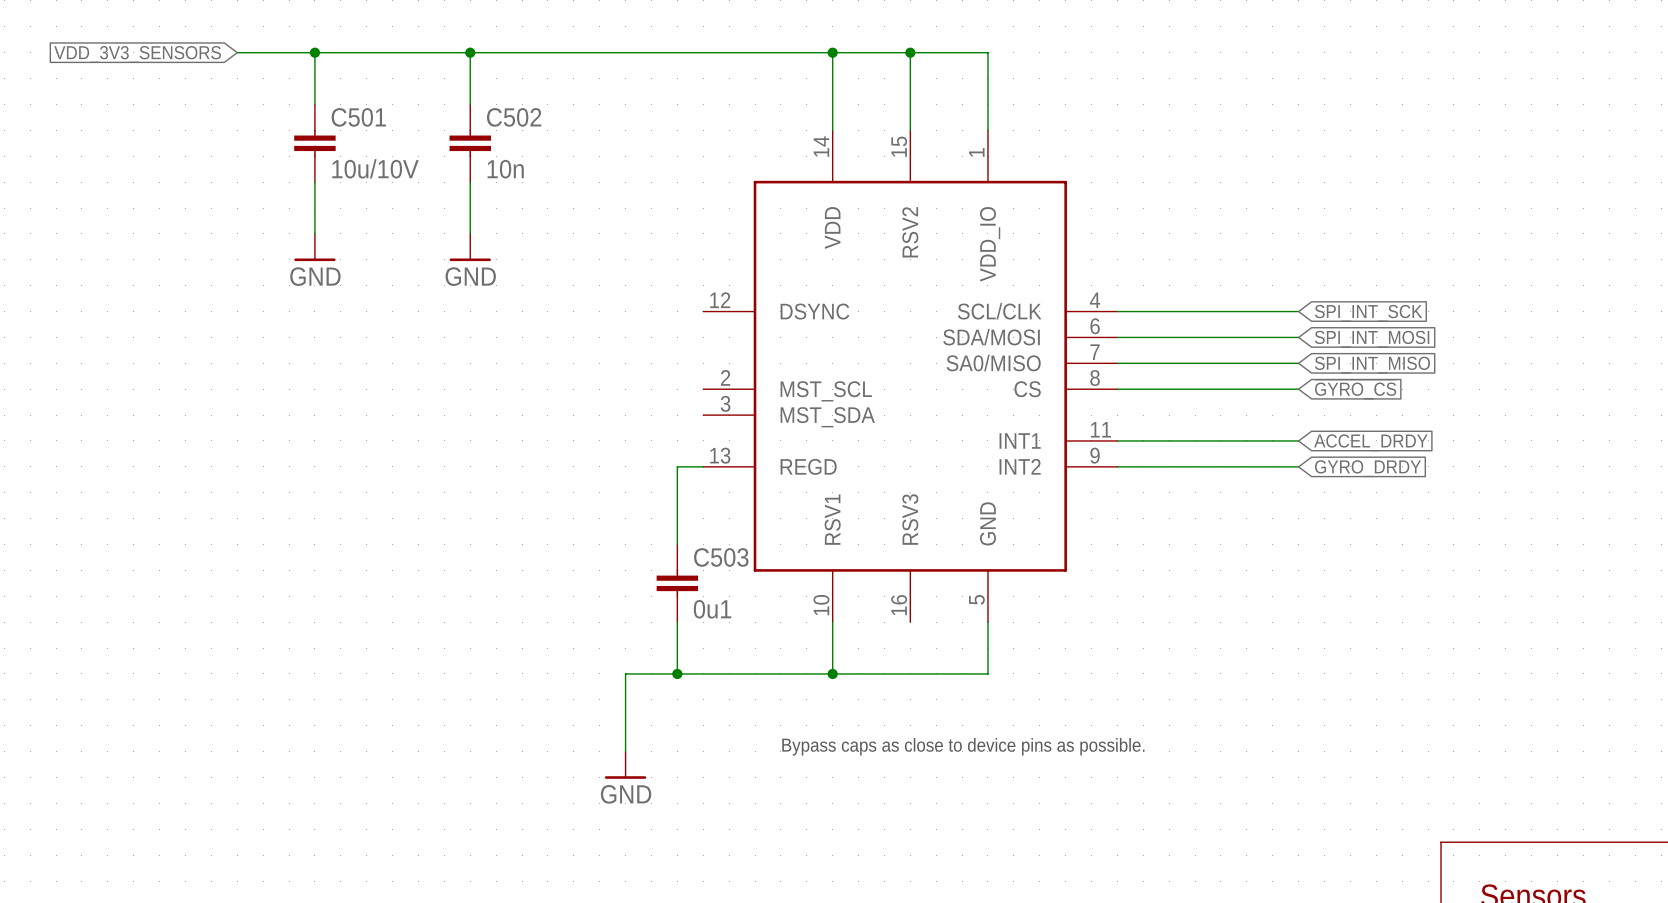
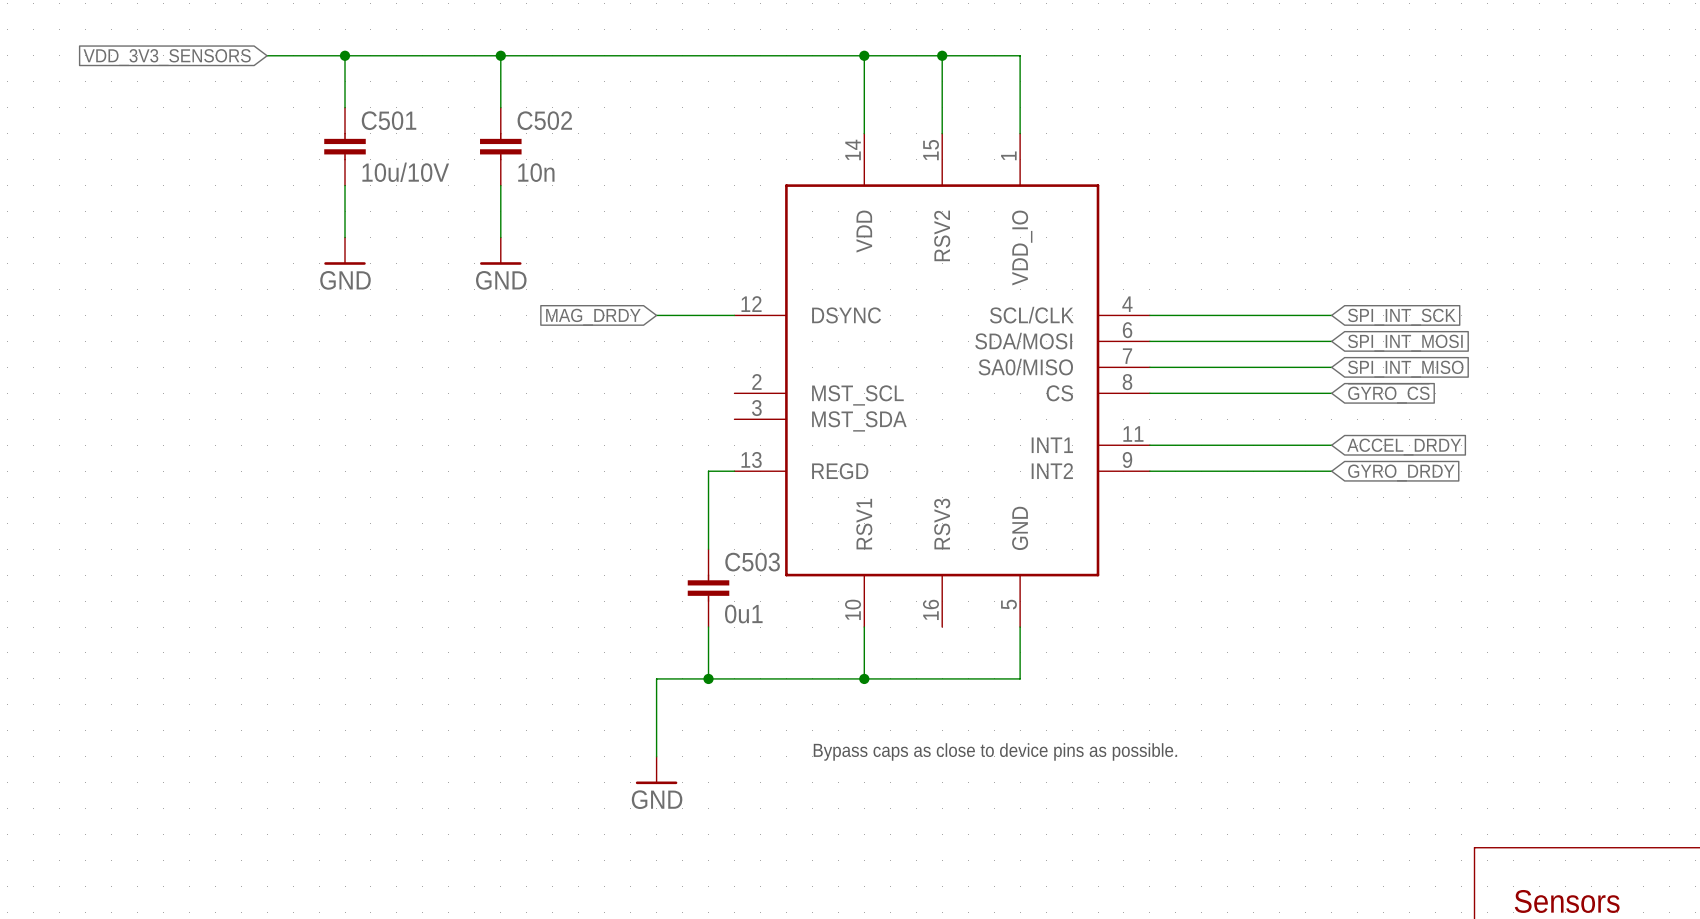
wire: none -> (656, 315) (734, 315)
global label: none -> MAG_DRDY (593, 317)

